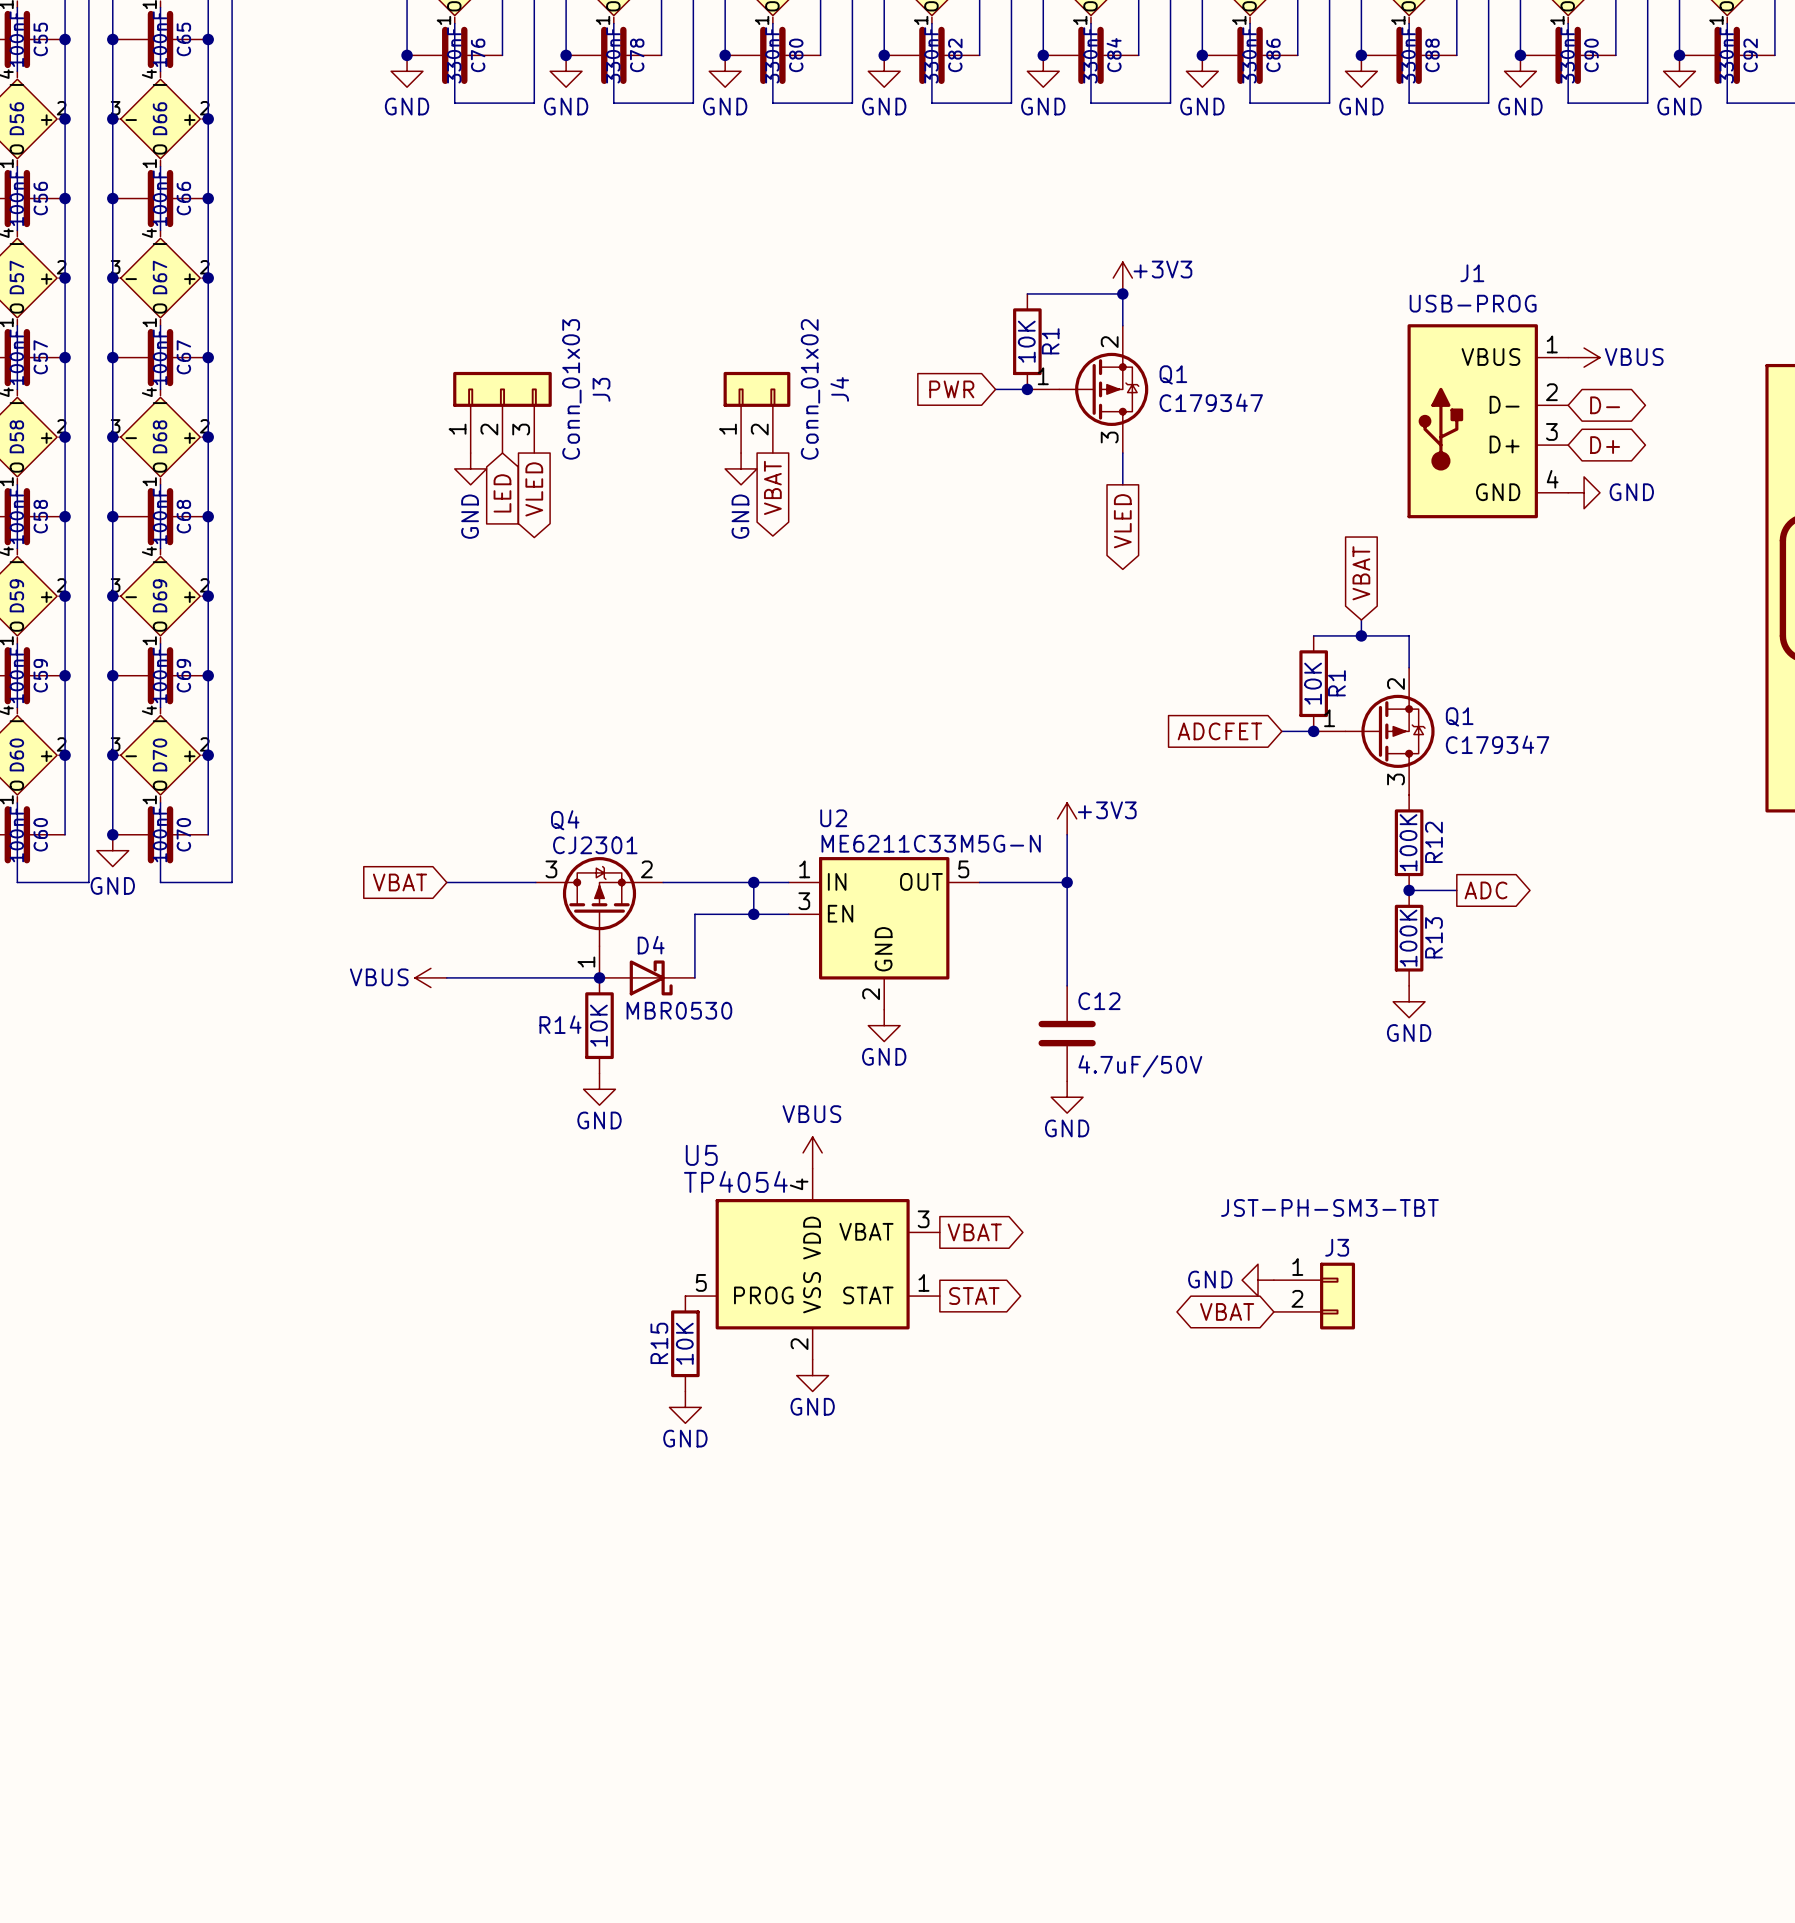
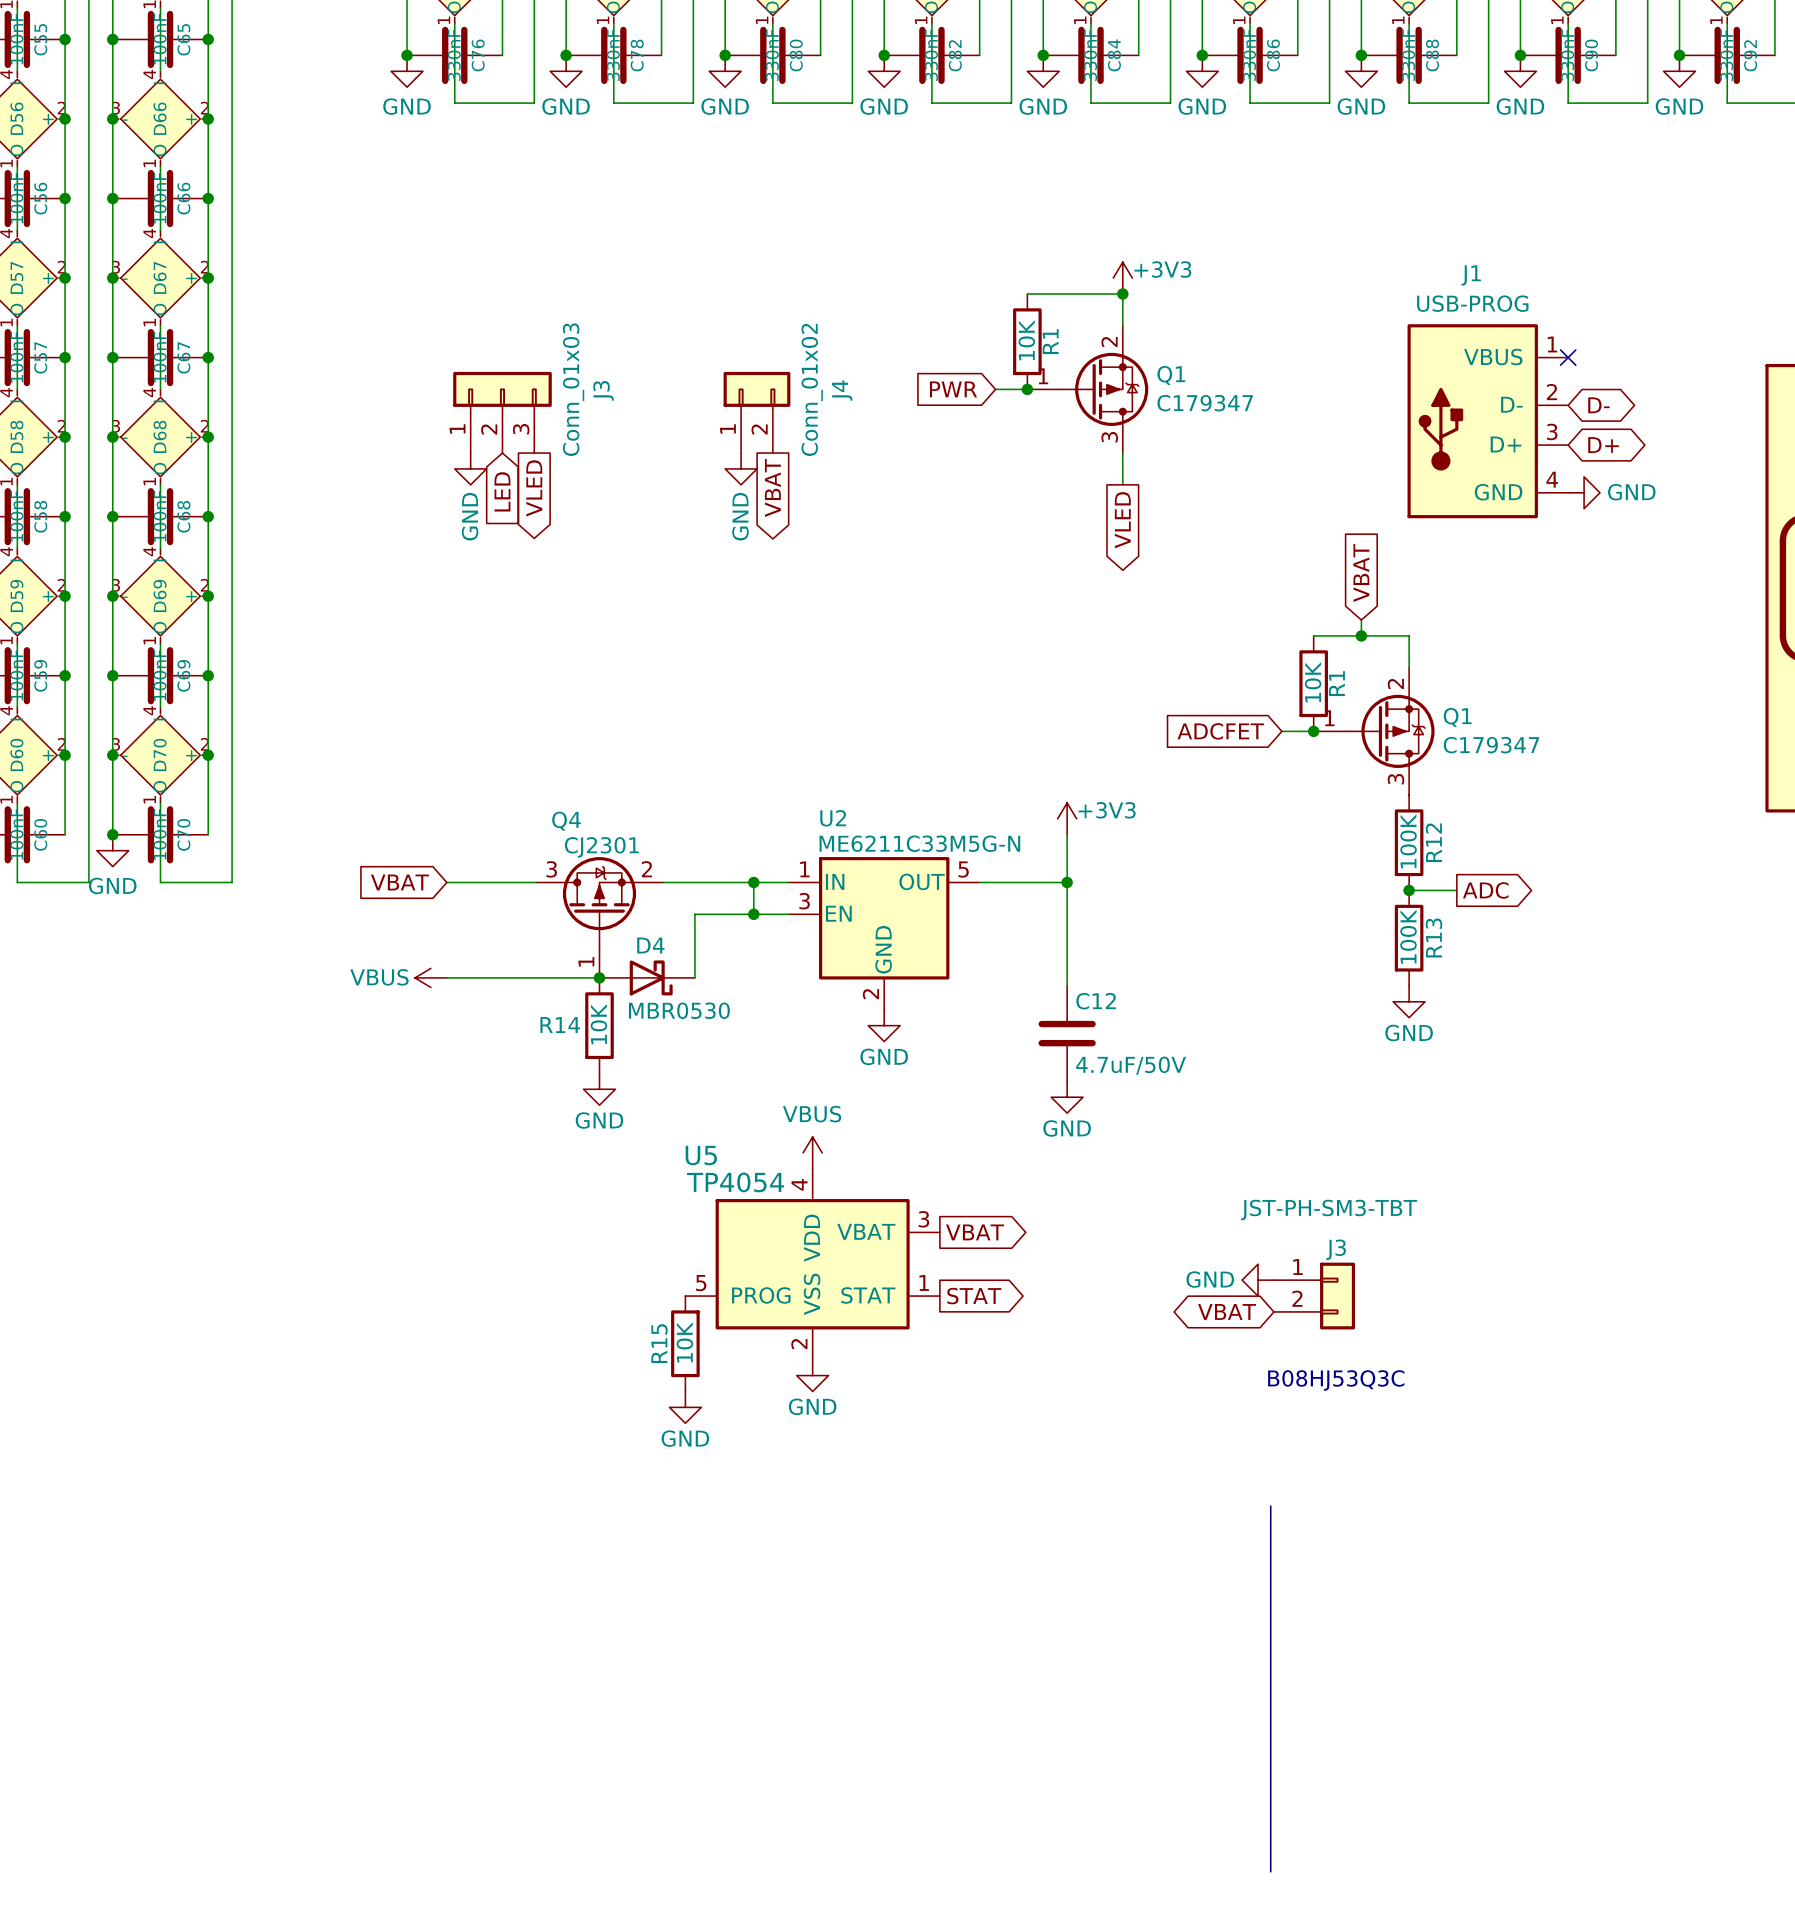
no-connect mark: none -> (1568, 357)
power symbol: VBUS (1584, 357) -> none
text: none -> B08HJ53Q3C (1336, 1380)
line: none -> (1270, 1506) (1270, 1871)

